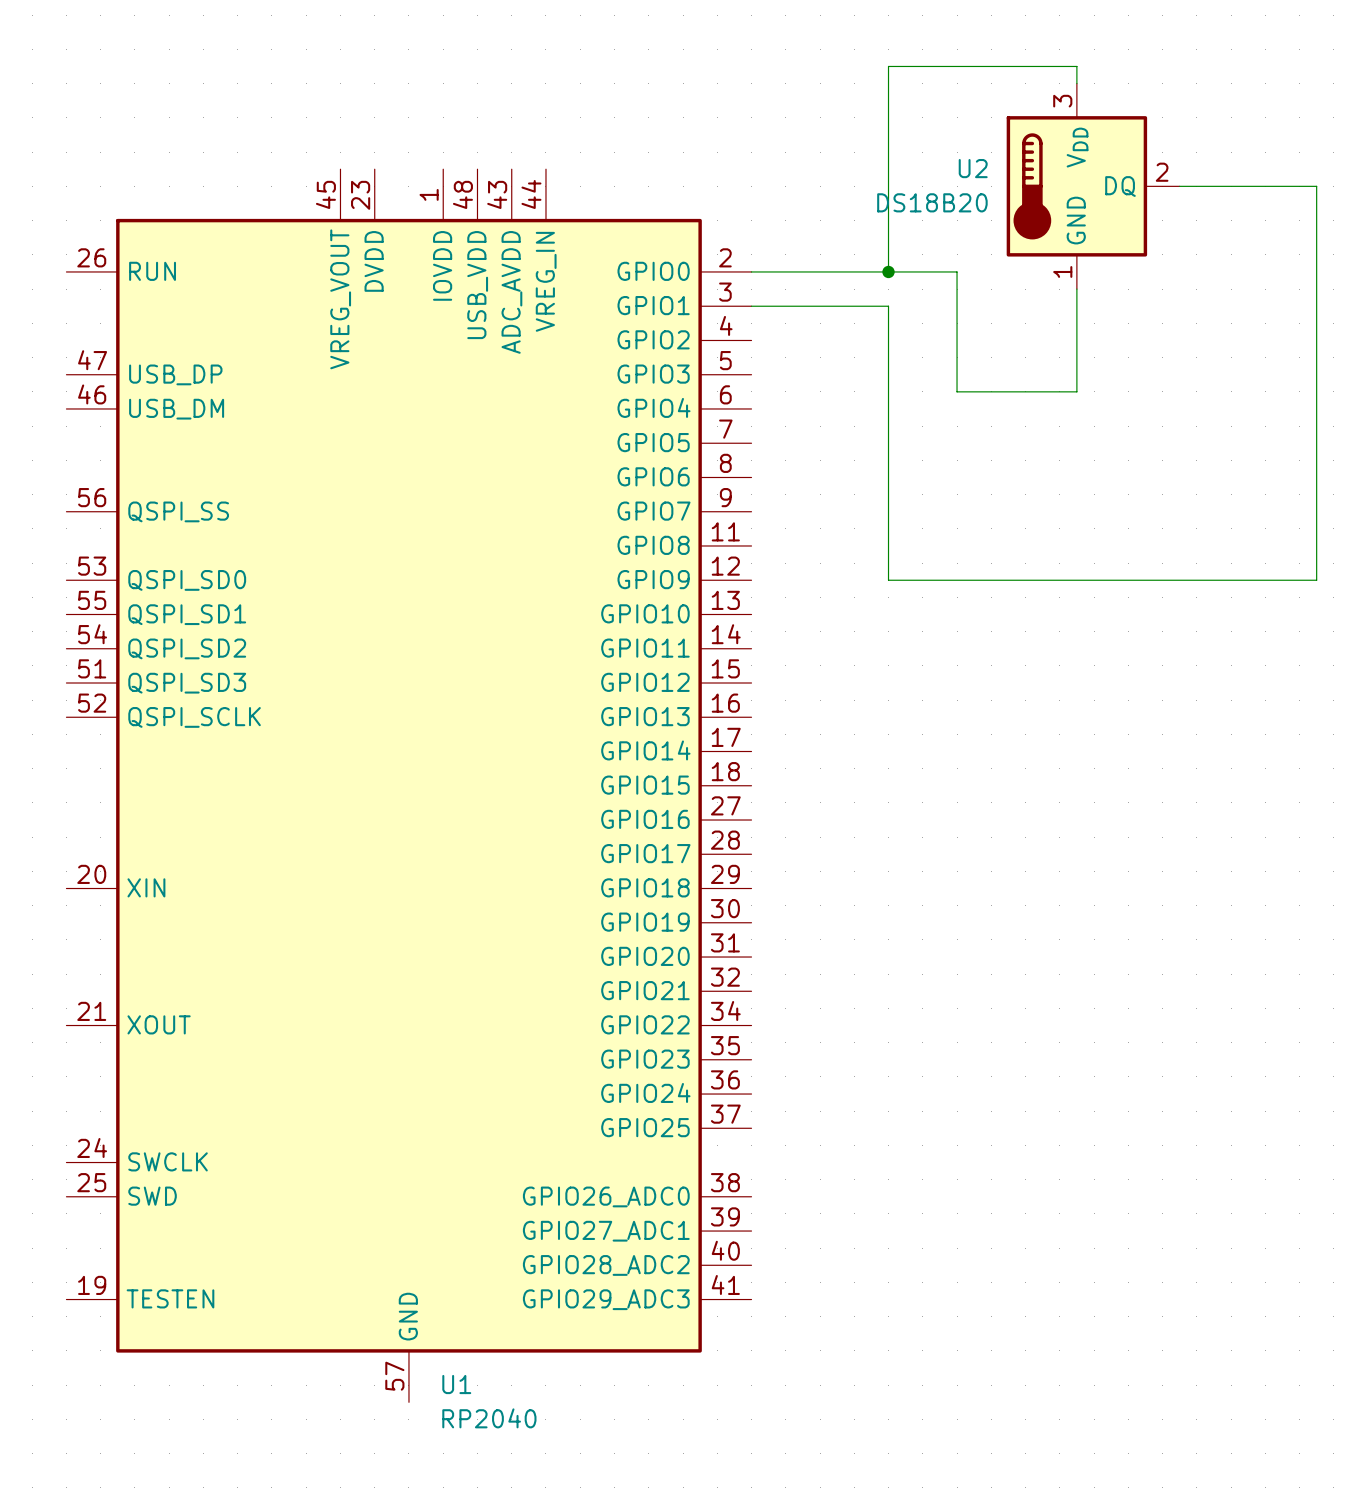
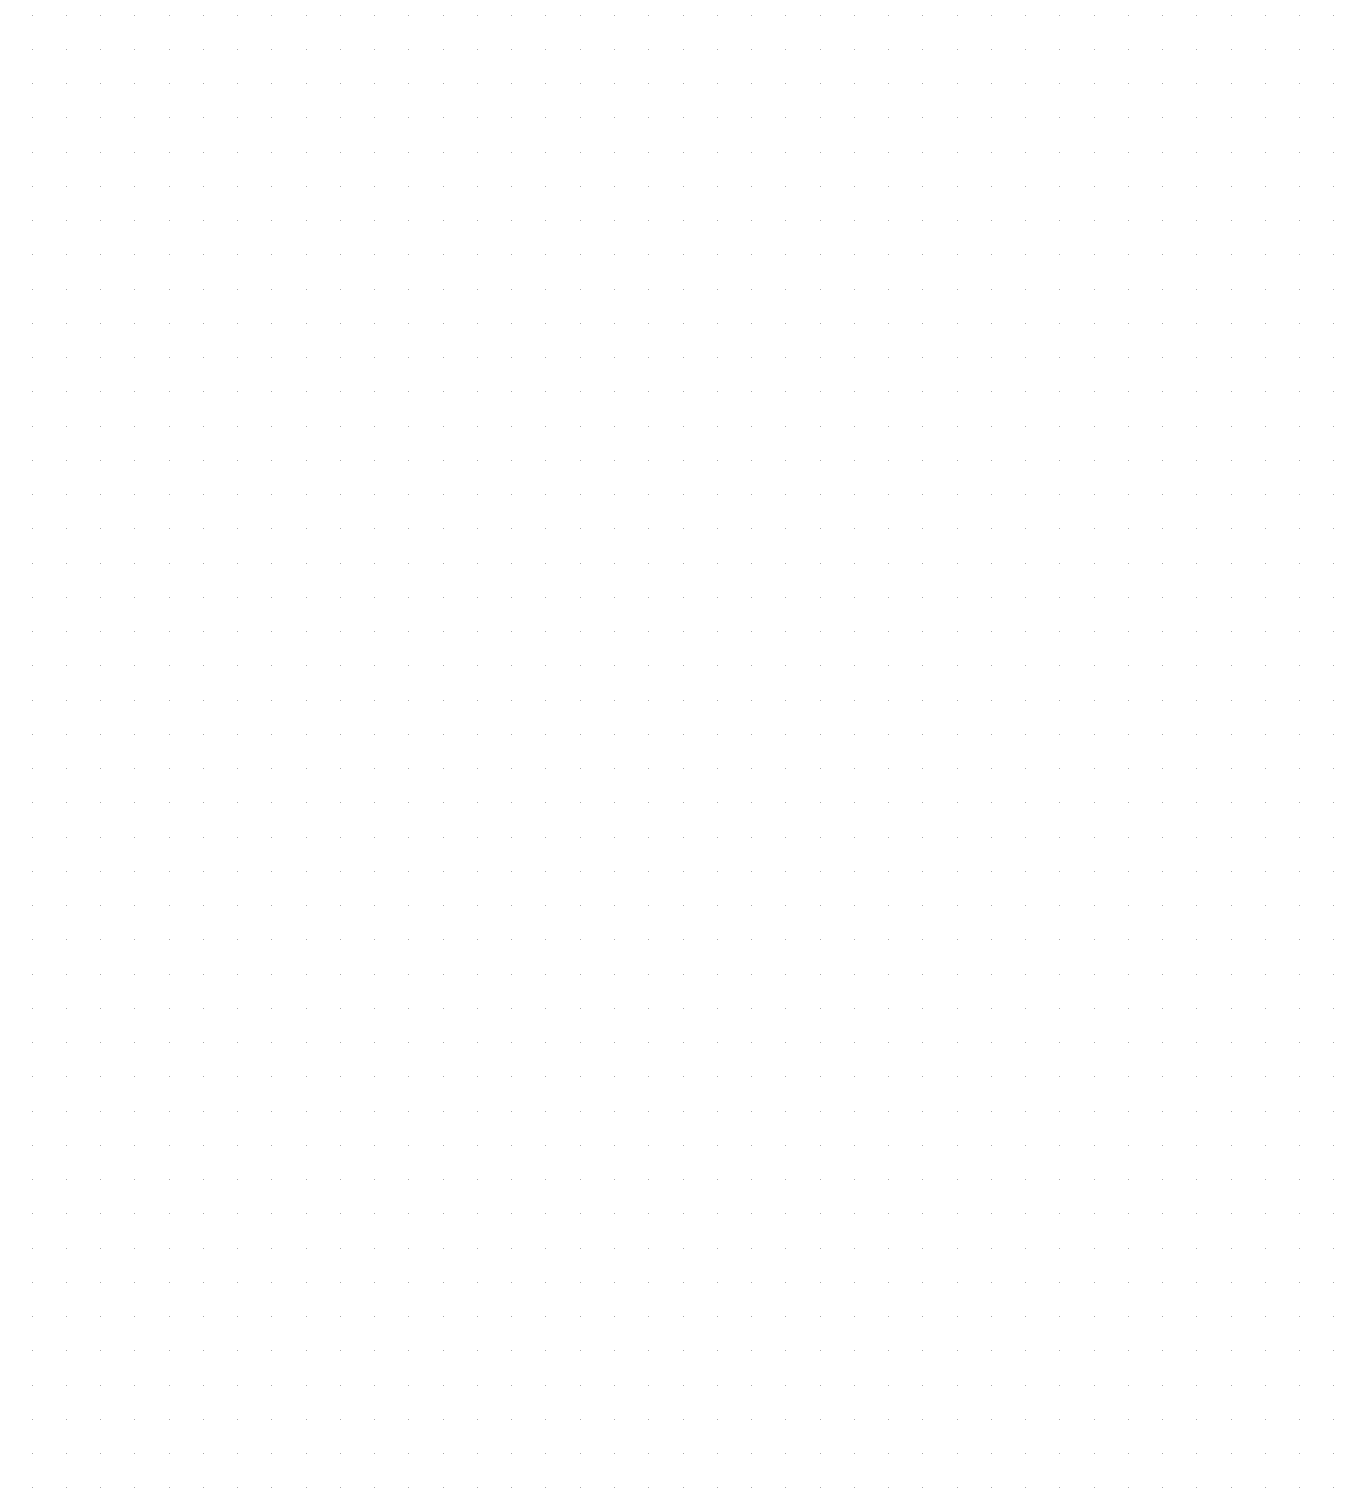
wire: (1076, 83) (1076, 66) (888, 66) (888, 271) -> none
U2: DS18B20 (1093, 186) -> none
wire: (1179, 186) (1316, 186) (1316, 580) (888, 580) (888, 306) (751, 306) -> none
wire: (751, 271) (957, 271) (957, 391) (1076, 391) (1076, 289) -> none
junction: (888, 271) -> none
U1: RP2040 (408, 785) -> none

